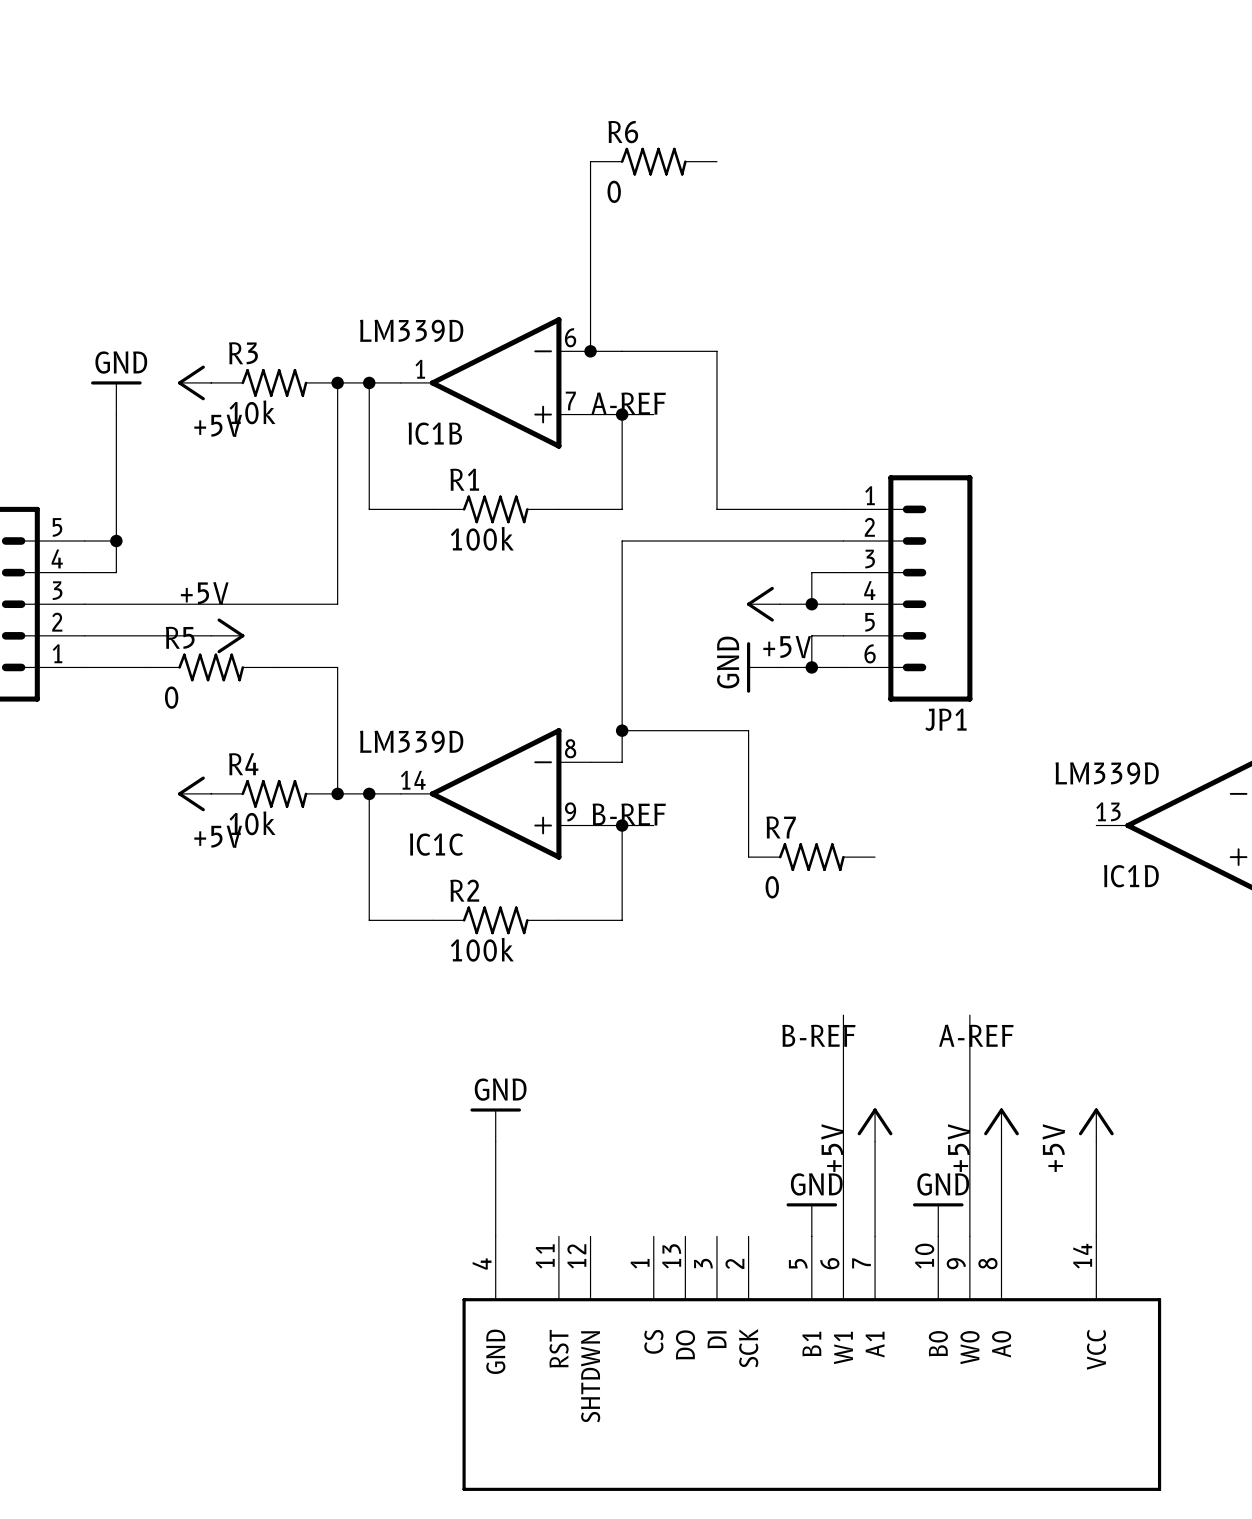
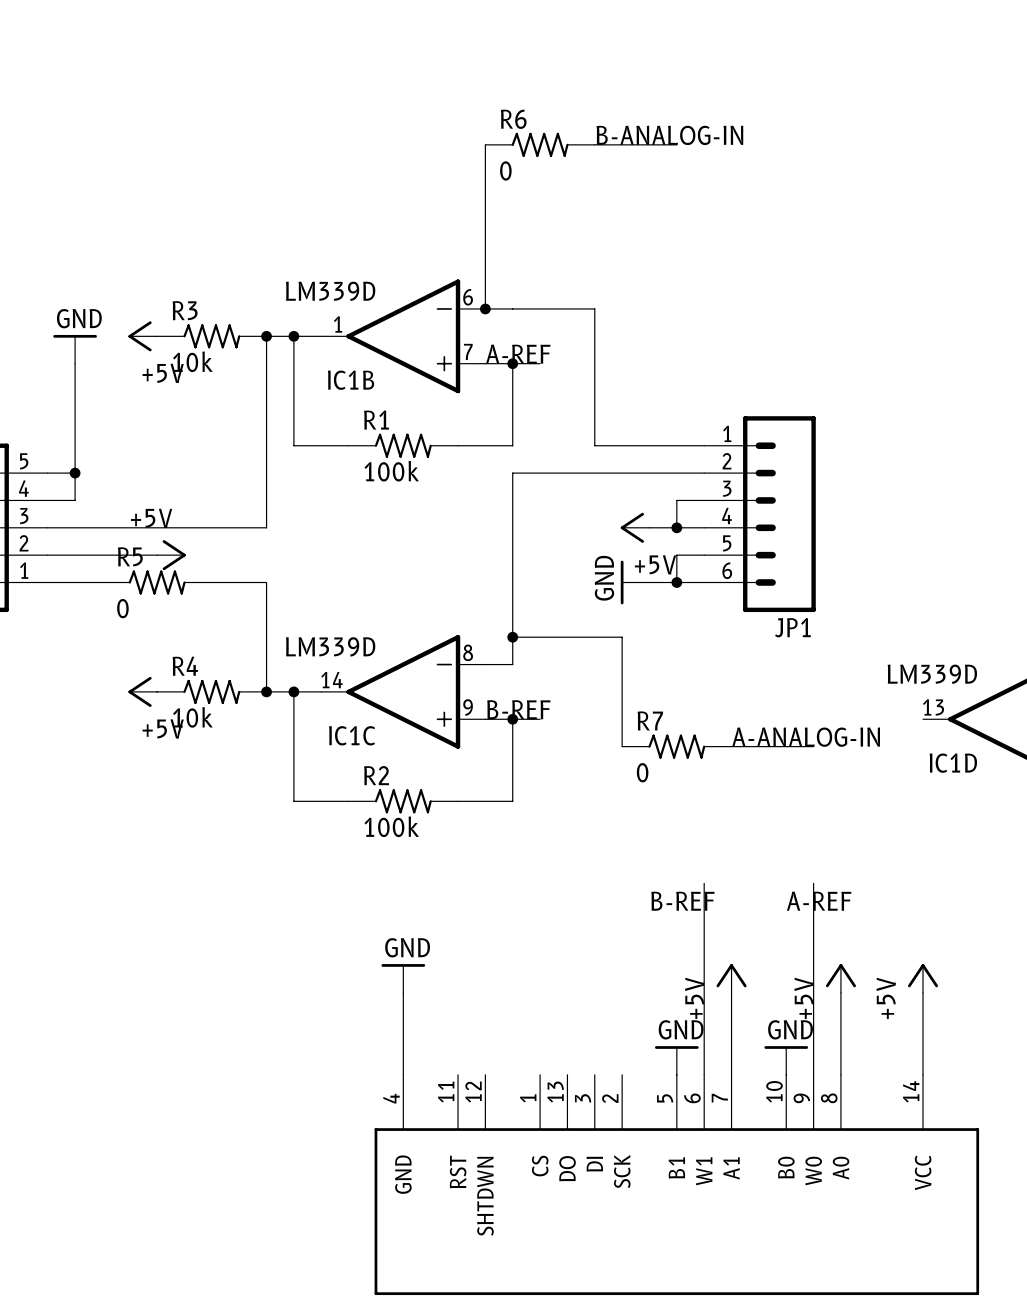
label: none -> B-ANALOG-IN (669, 135)
wire: none -> (594, 144) (676, 144)
label: none -> A-ANALOG-IN (806, 737)
wire: none -> (731, 746) (813, 746)

